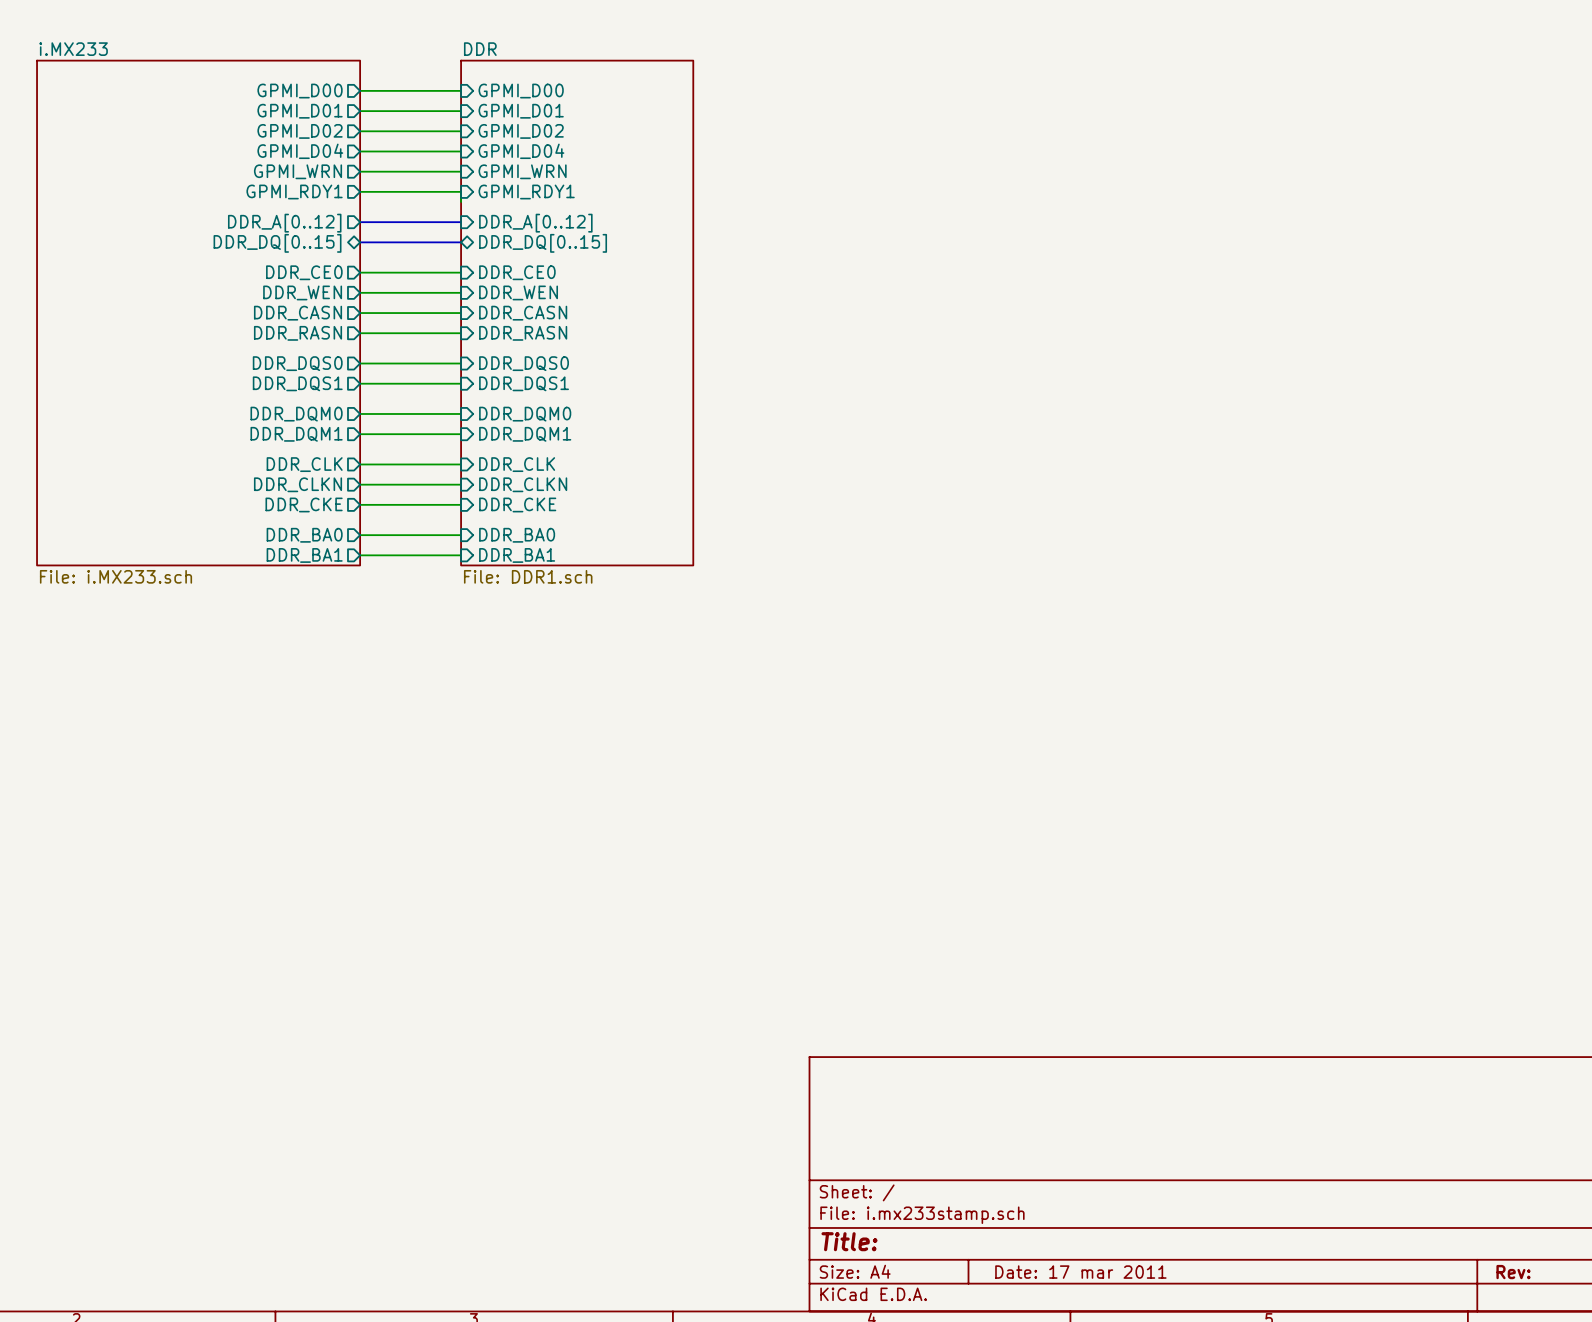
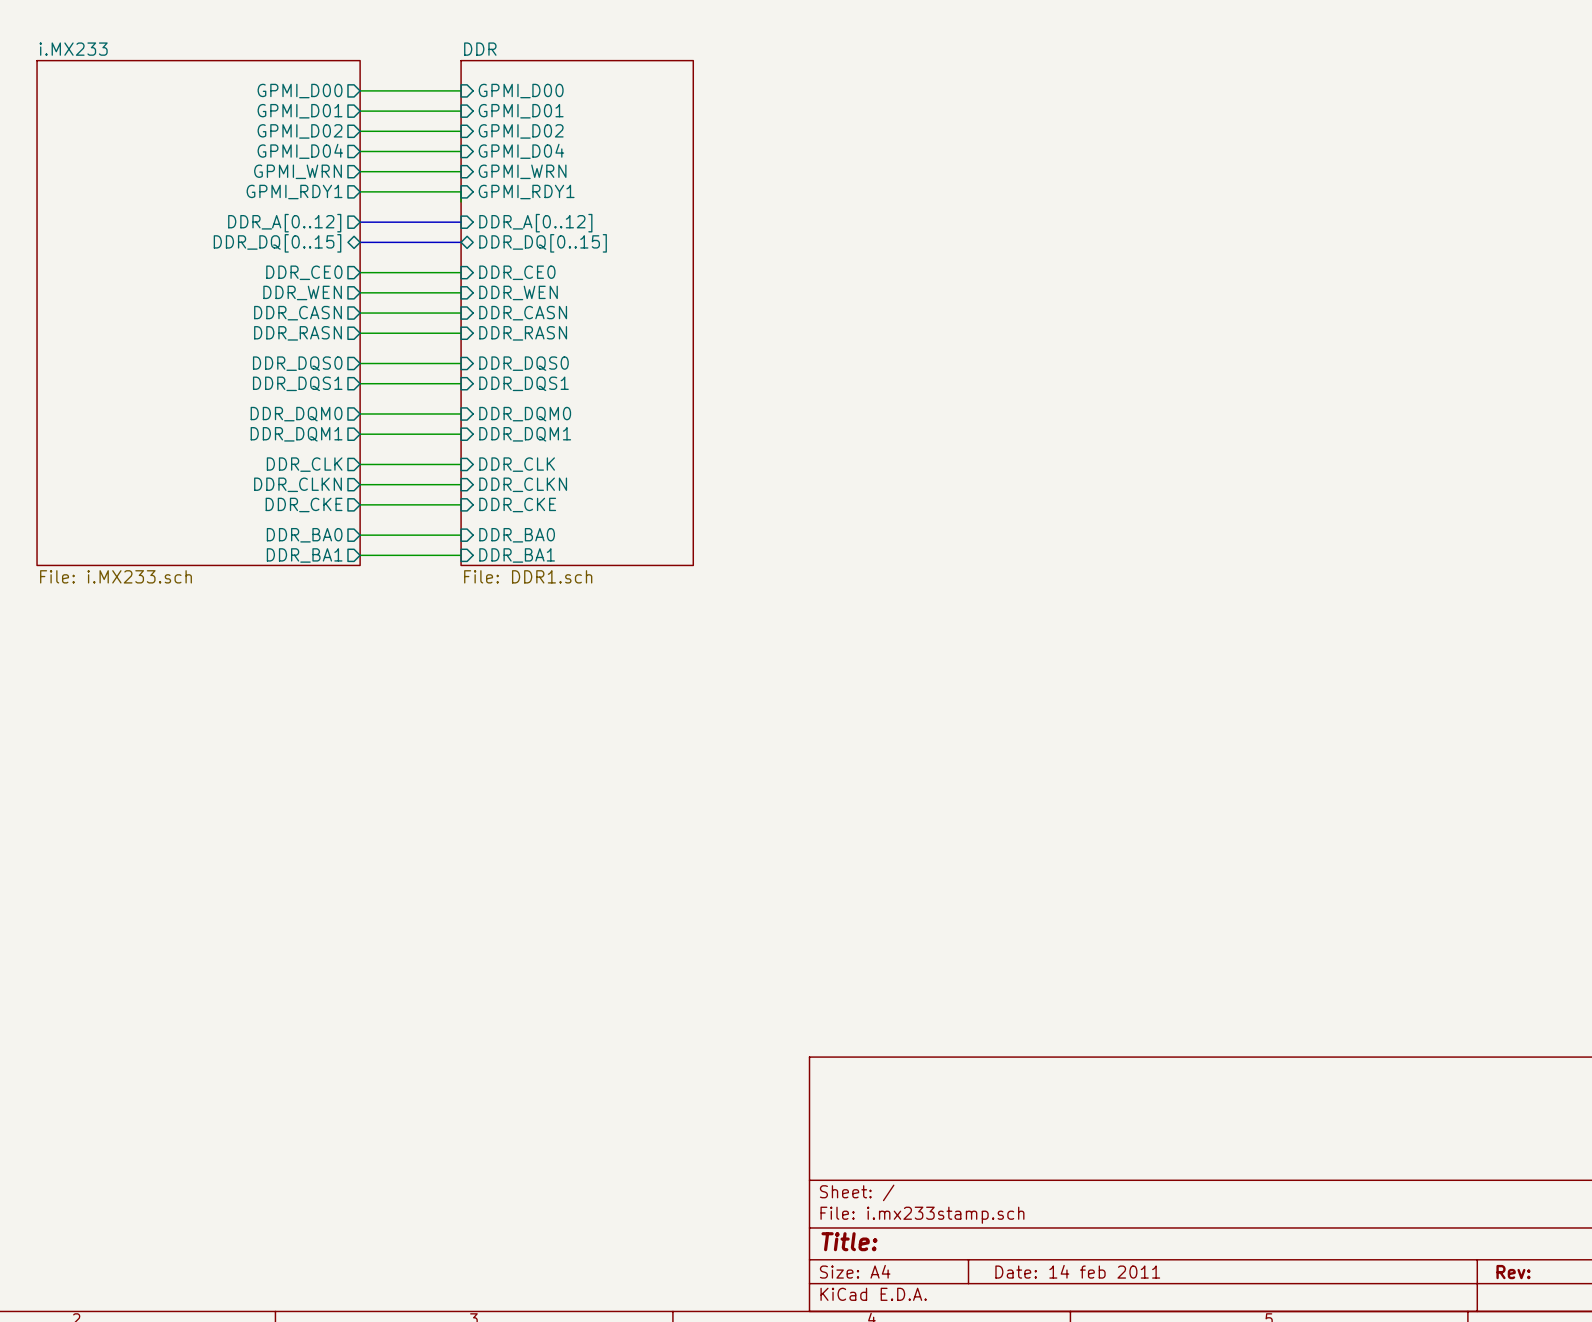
title block: Date: 17 mar 2011 (1080, 1272) -> Date: 14 feb 2011 (1077, 1271)

